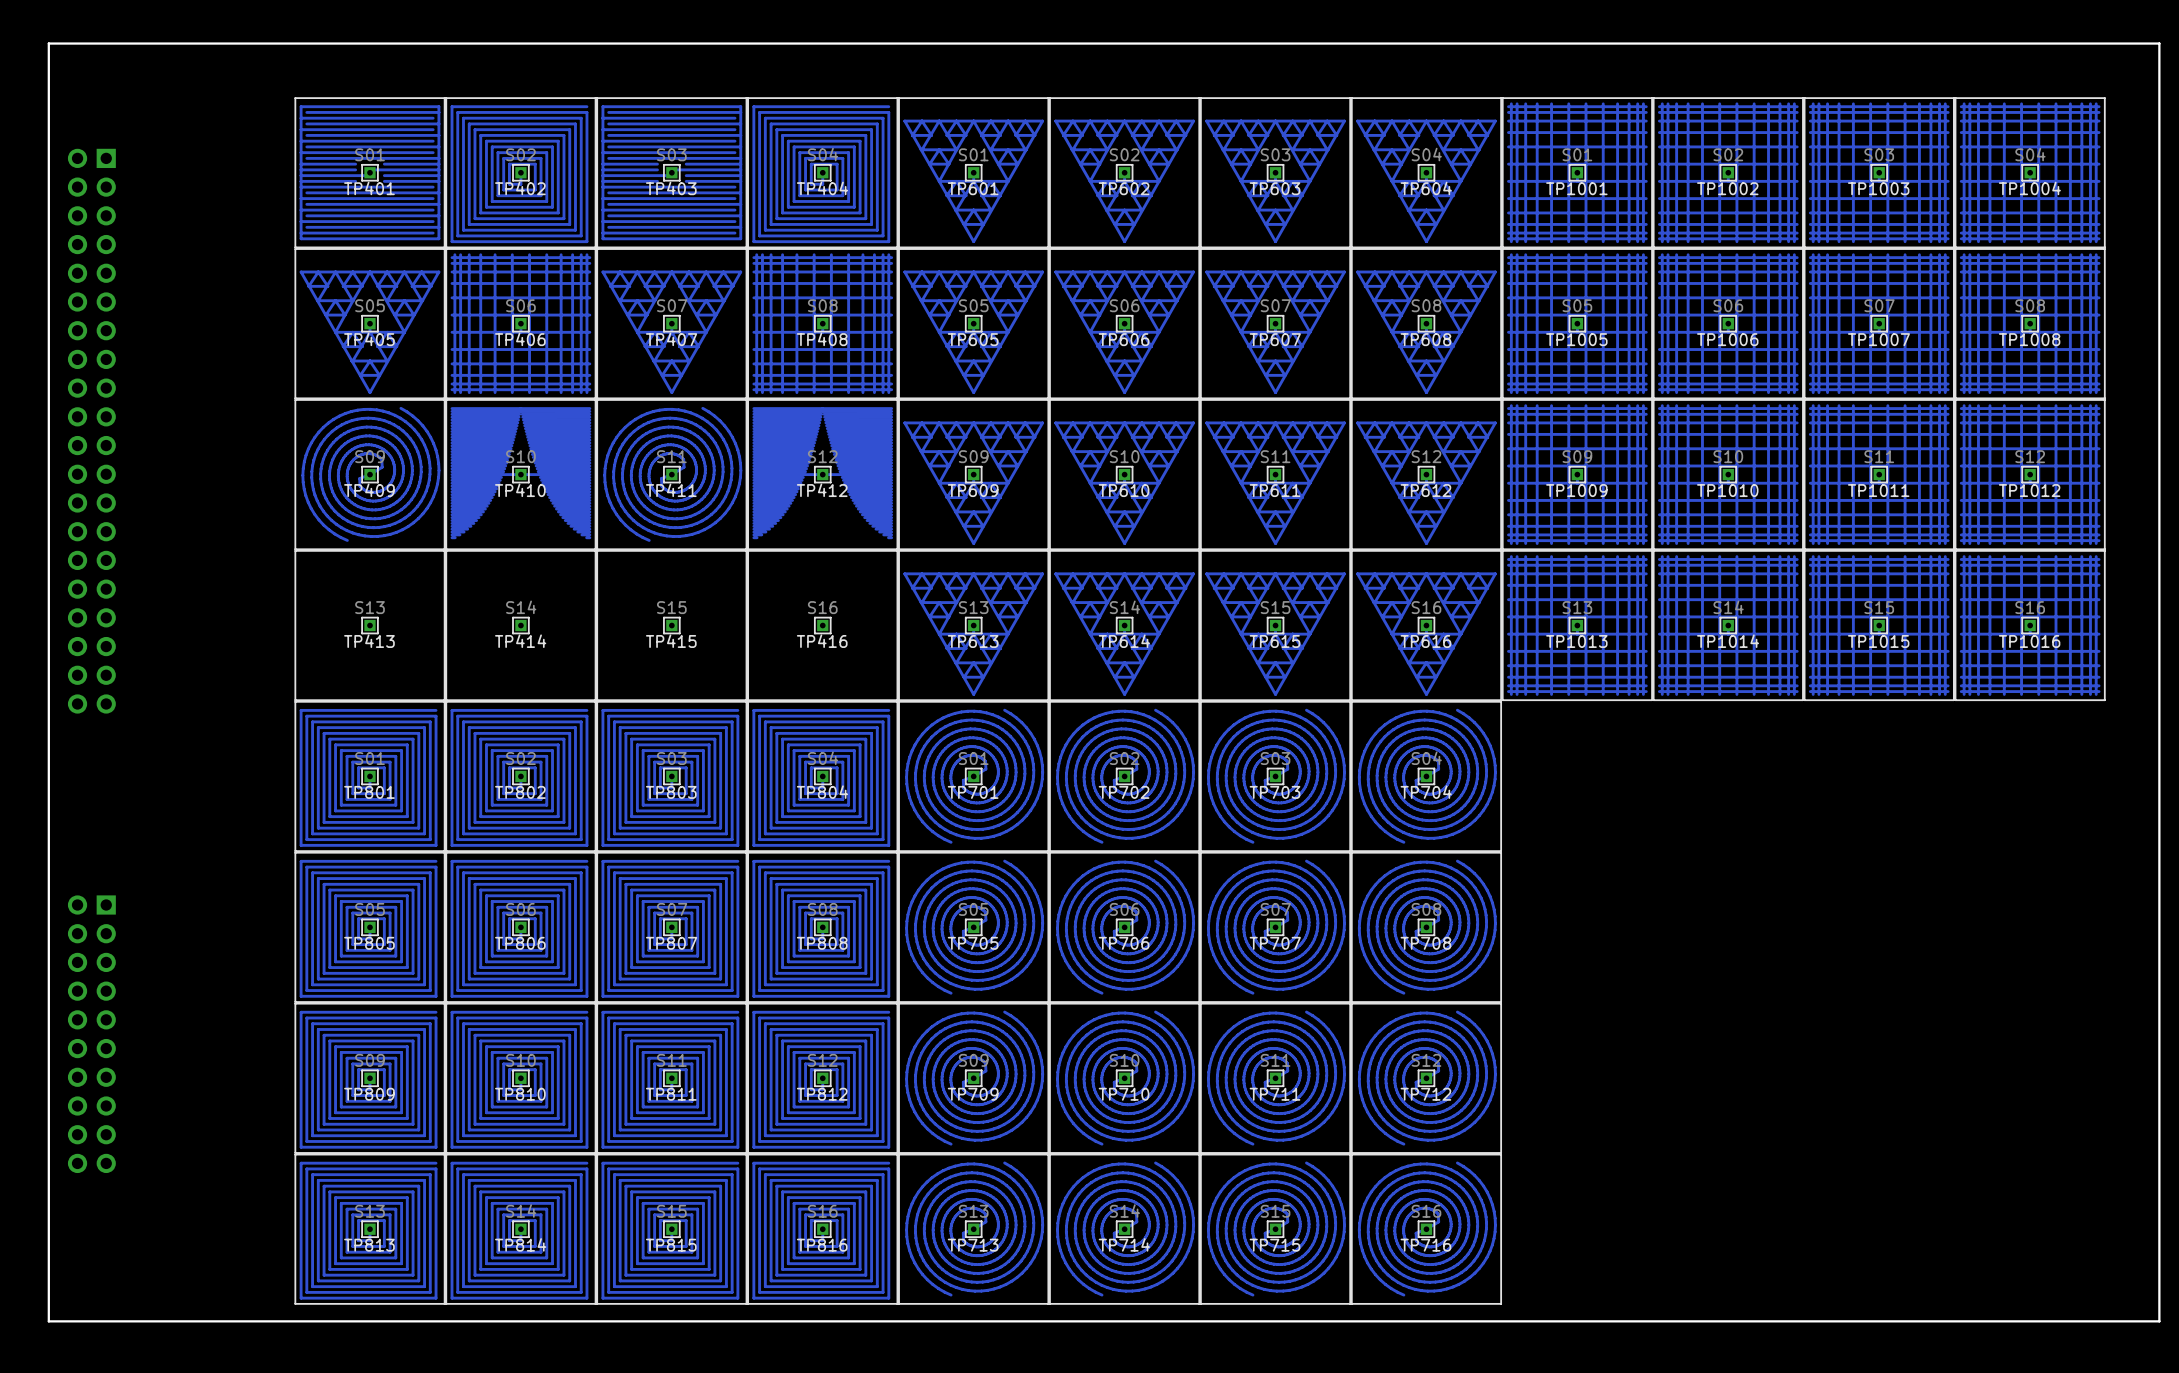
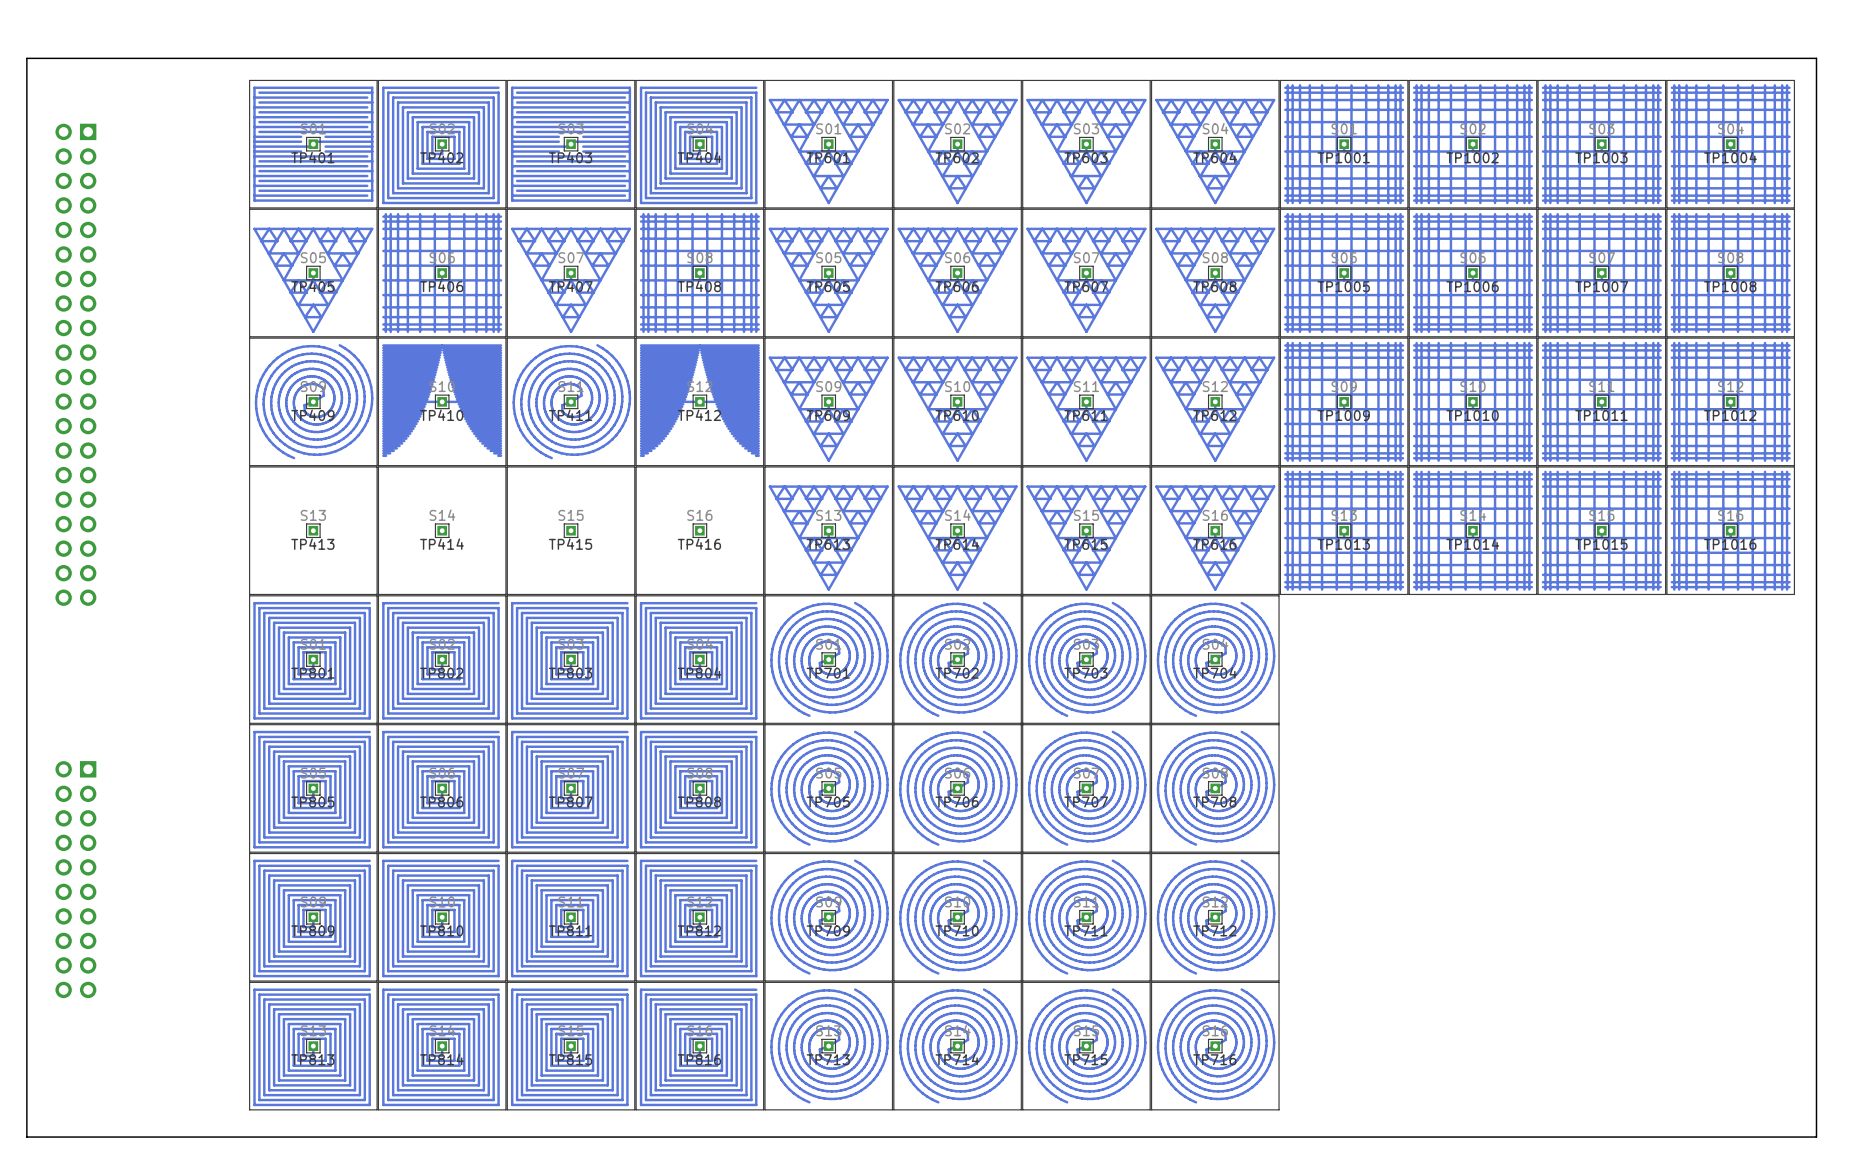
board edge: (2159, 43) (2159, 1321) (48, 1321) (48, 43) (2159, 43) -> (1816, 58) (1816, 1137) (26, 1137) (26, 58) (1816, 58)

